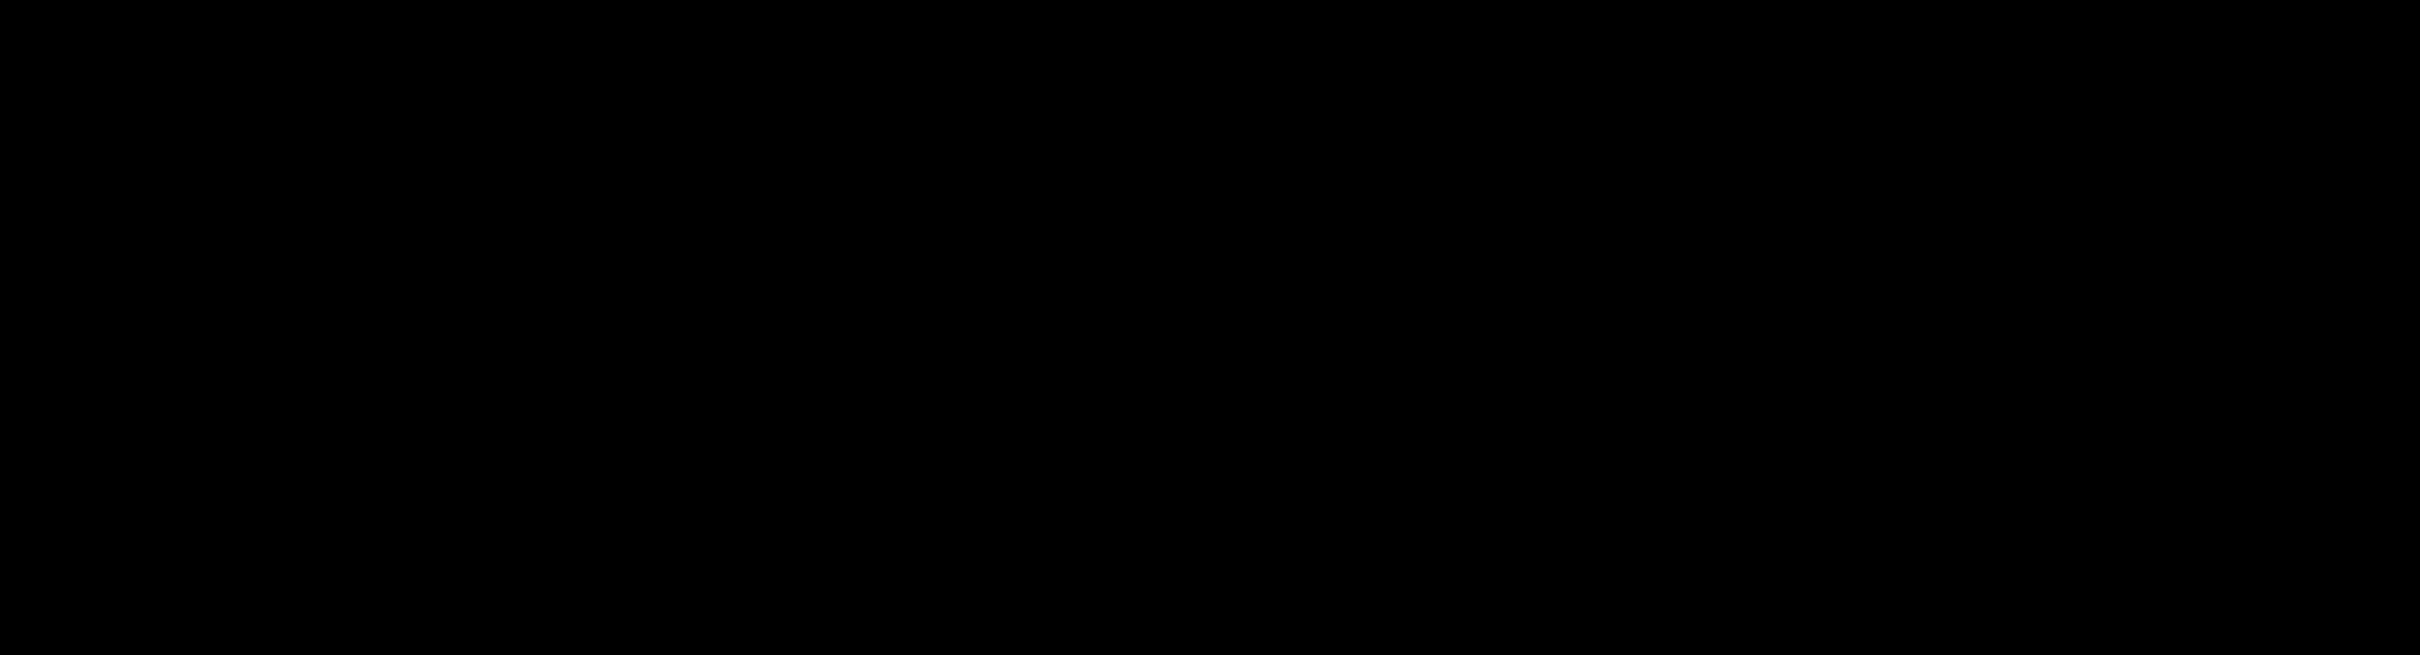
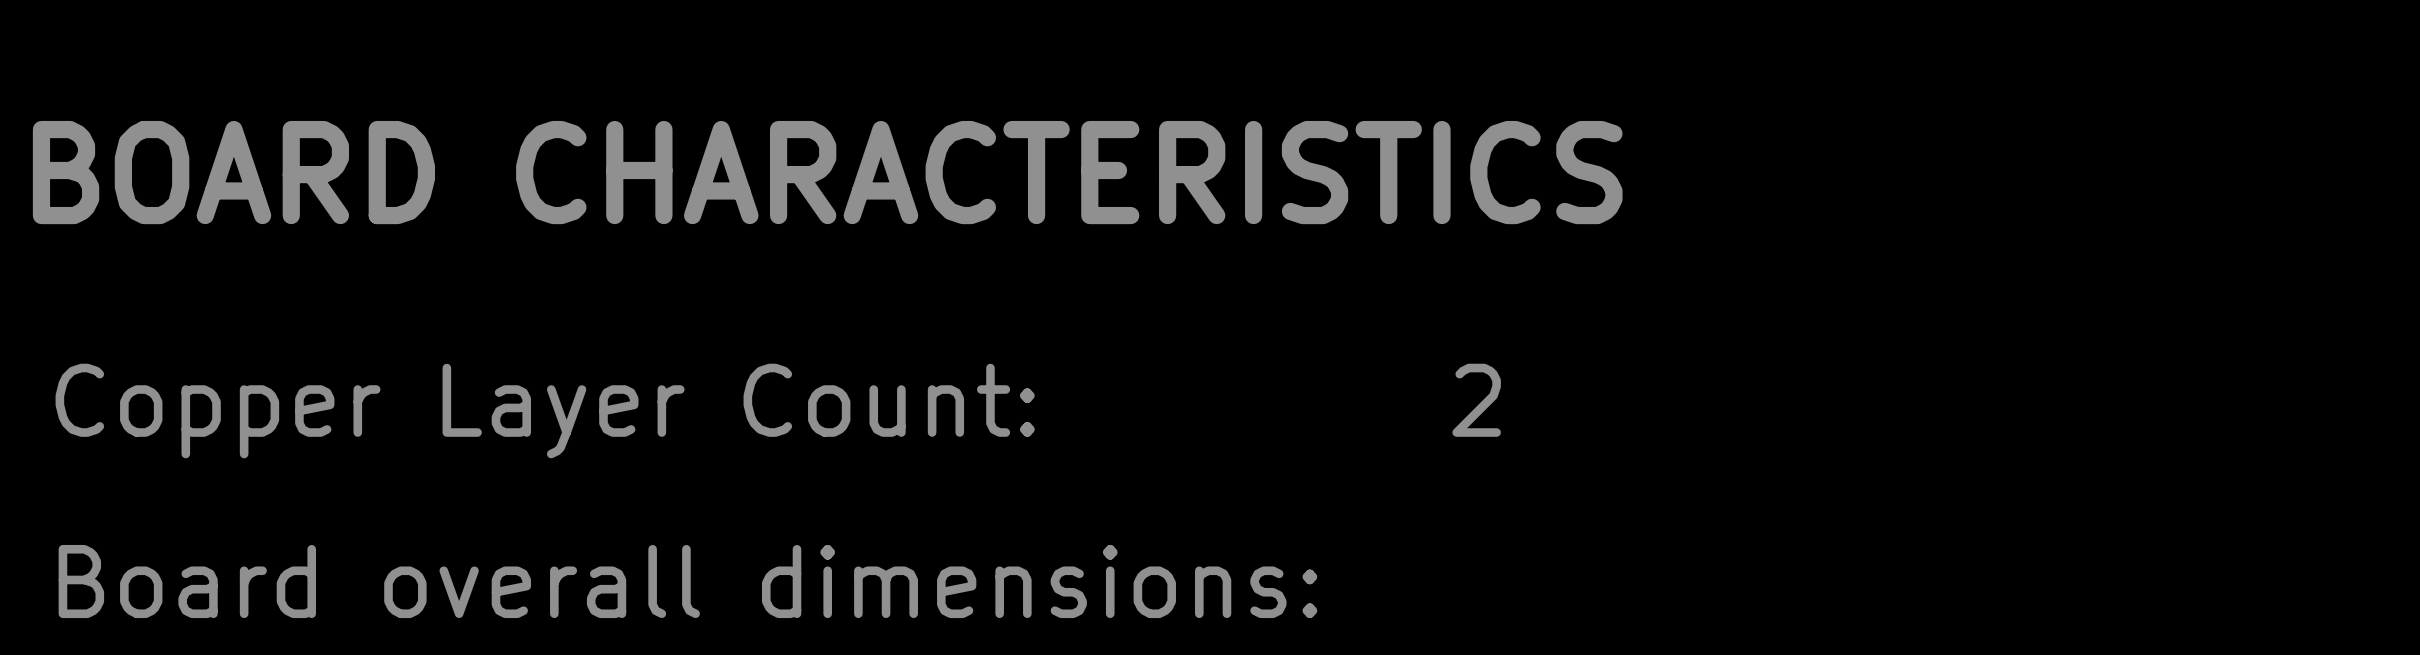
text: none -> BOARD CHARACTERISTICS (827, 172)
text: none -> 2 (1476, 400)
text: none -> Copper Layer Count: (545, 411)
text: none -> Board overall dimensions: (687, 581)

